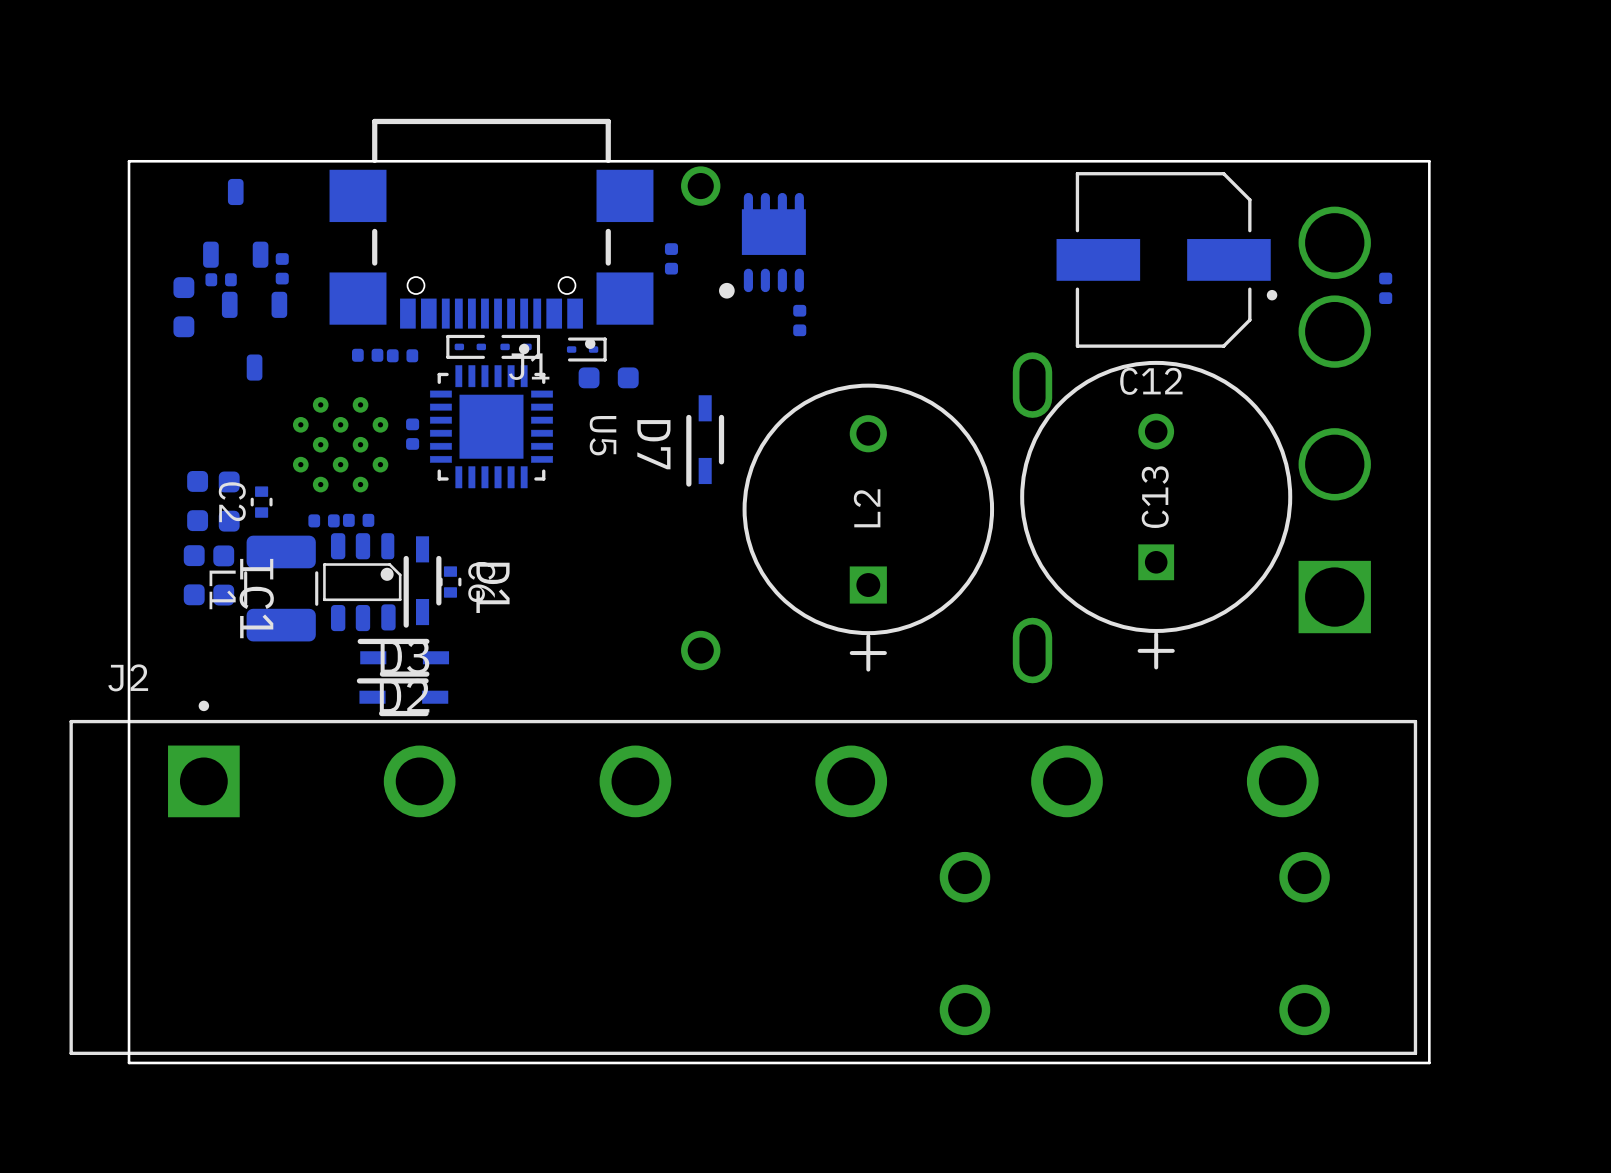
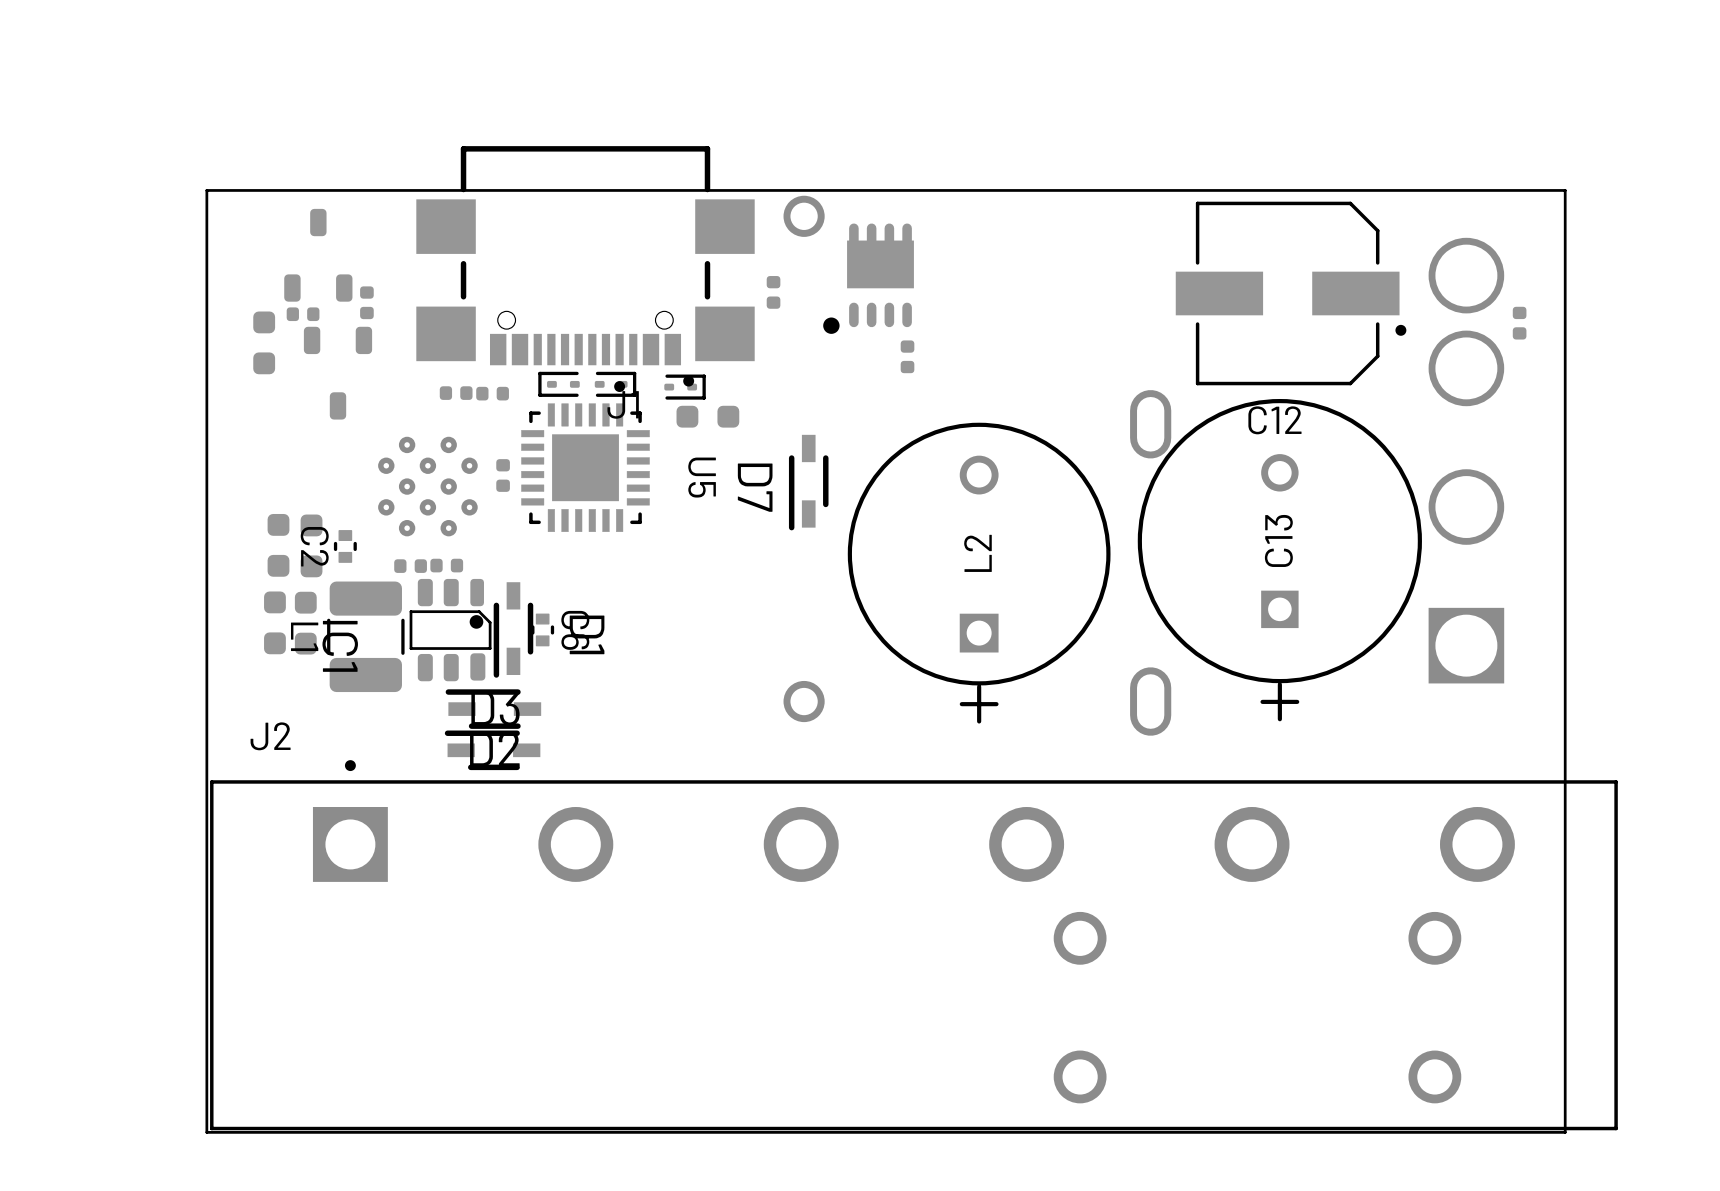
J2 position: (743, 877) -> (913, 945)

